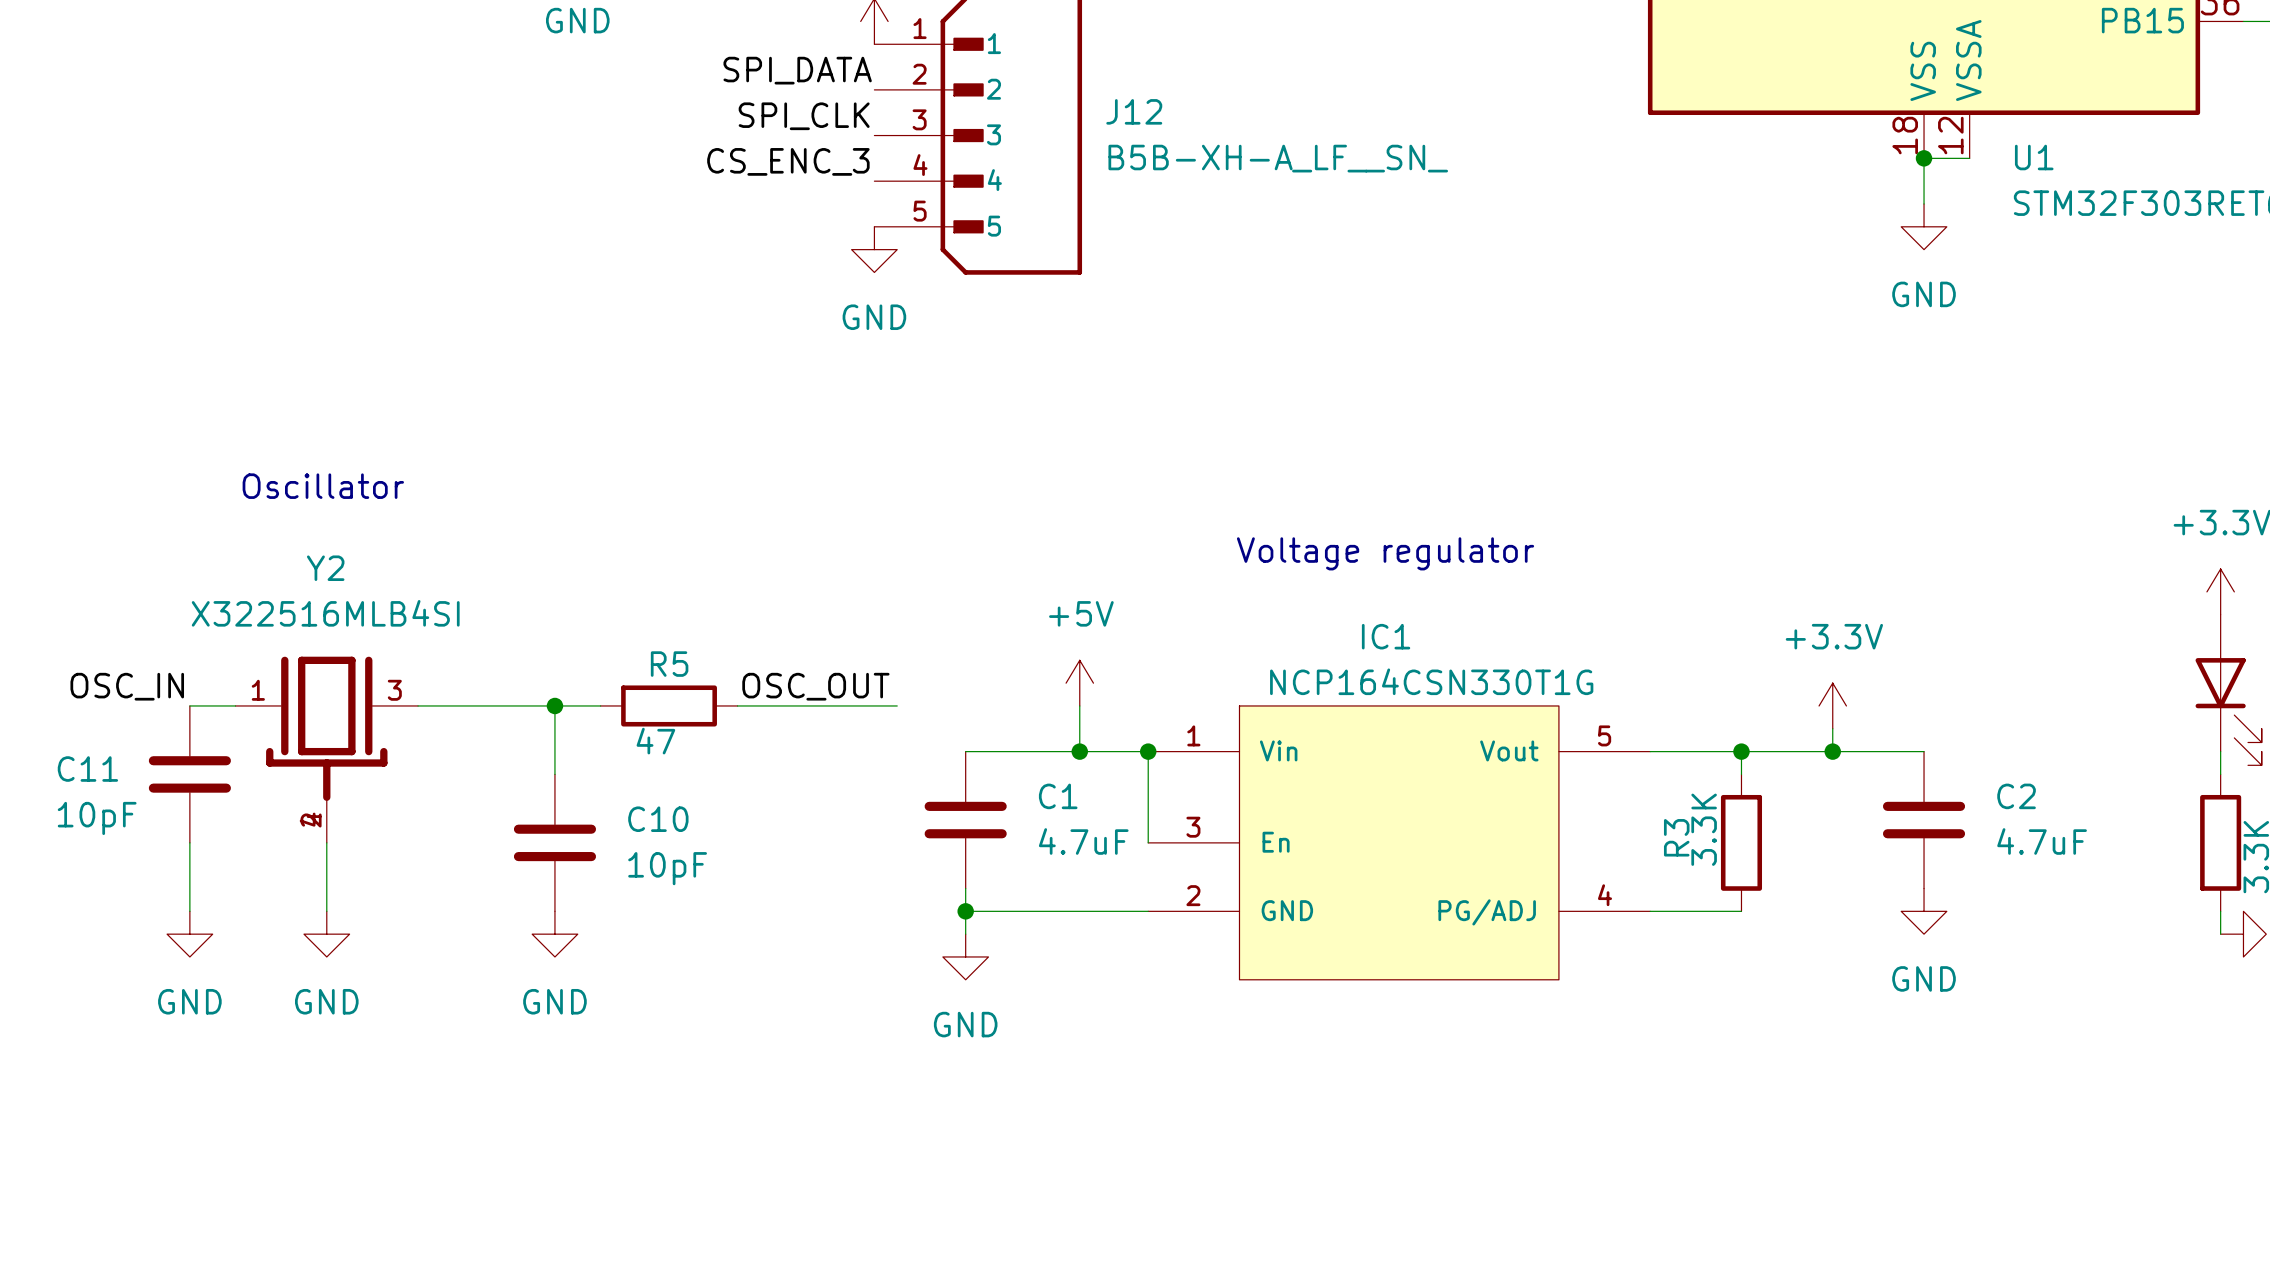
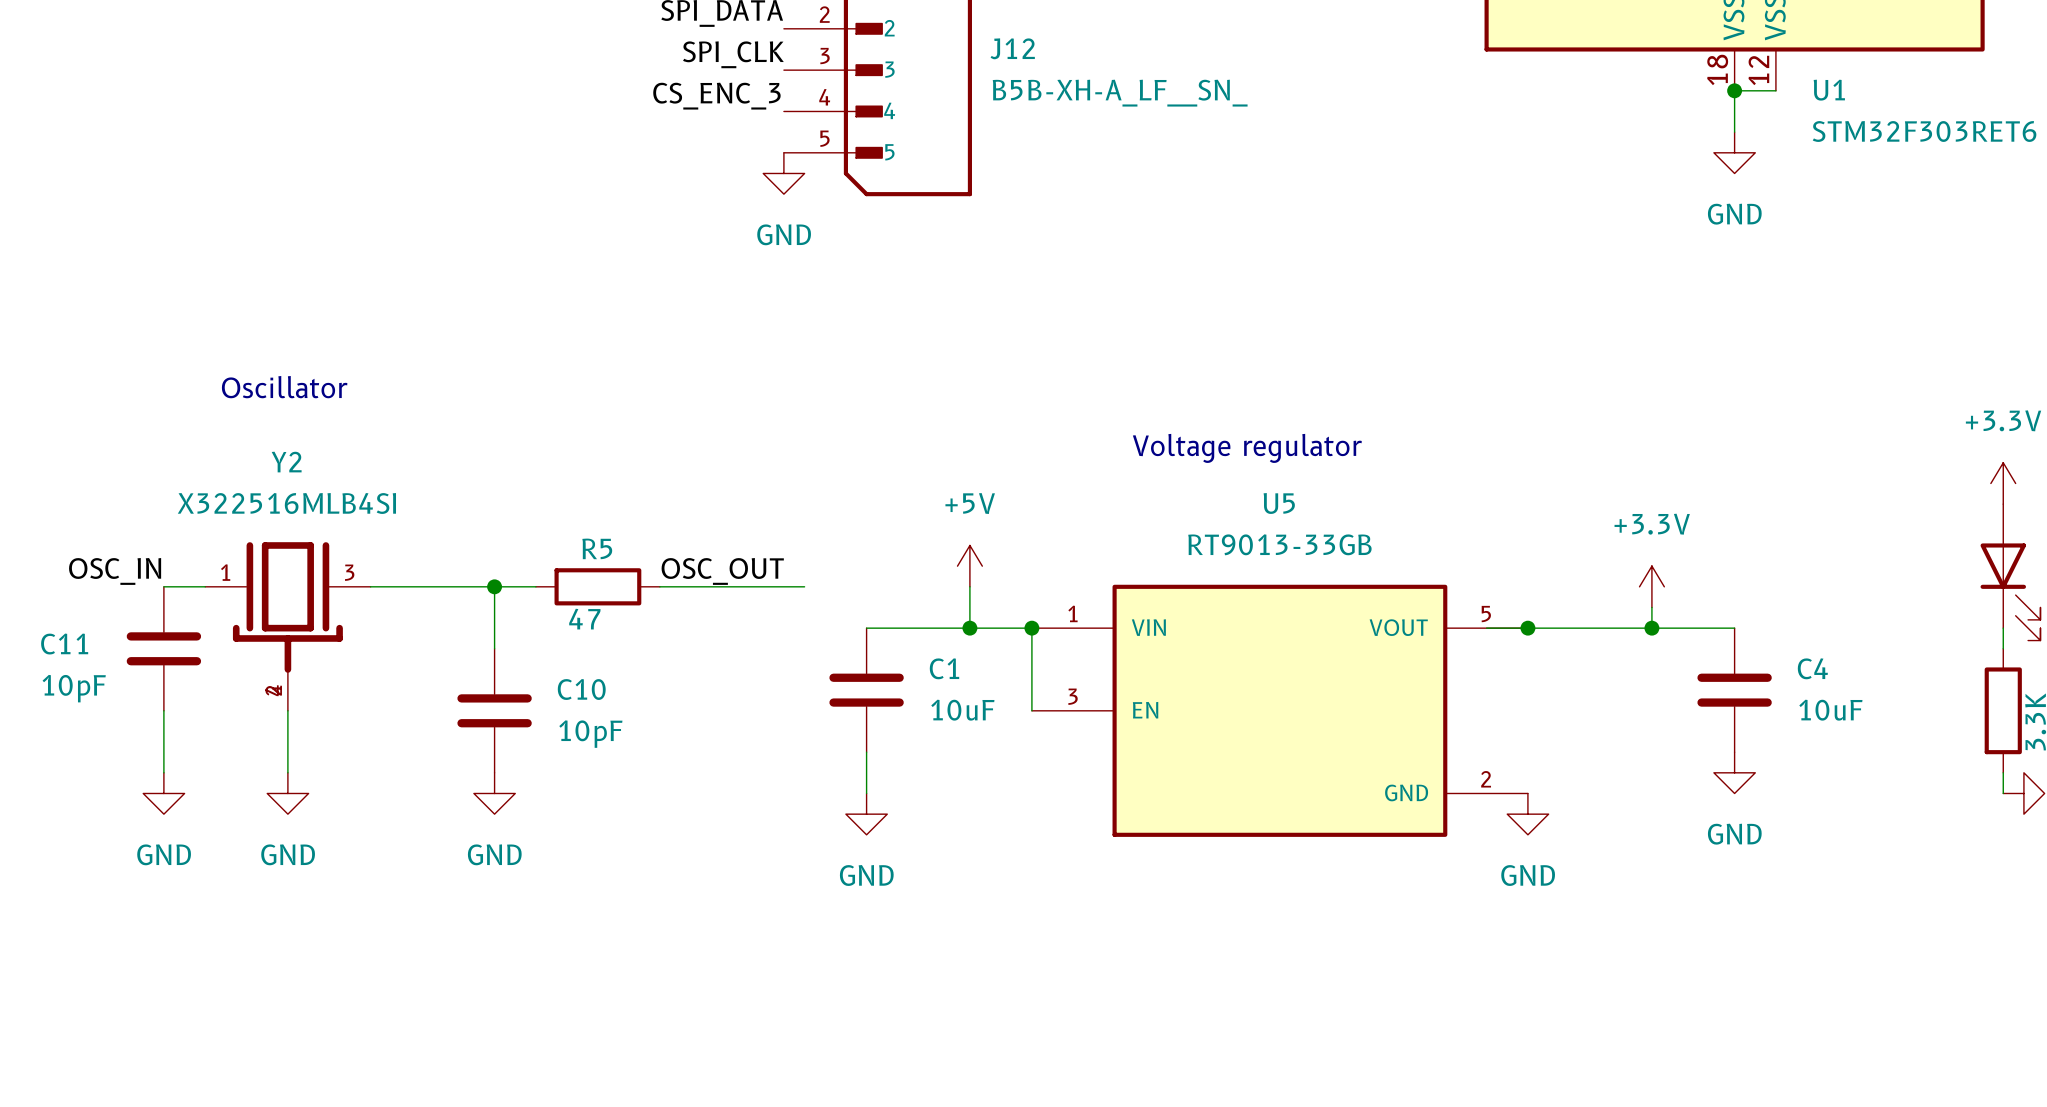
wire: (1741, 751) (1741, 774) -> none
junction position: (1741, 751) -> (1527, 628)
C2 name: C2 (2016, 796) -> C4 (1812, 668)
C1 value: 4.7uF (1083, 841) -> 10uF (962, 710)
C2 value: 4.7uF (2042, 841) -> 10uF (1830, 710)
IC1: NCP164CSN330T1G (1399, 842) -> none
U5: none -> RT9013-33GB (1279, 710)
R3: 3.3K (1741, 842) -> none
wire: (965, 911) (1148, 911) -> none
junction: (965, 911) -> none
wire: (1650, 911) (1741, 911) -> none
power symbol: none -> GND (1527, 814)

